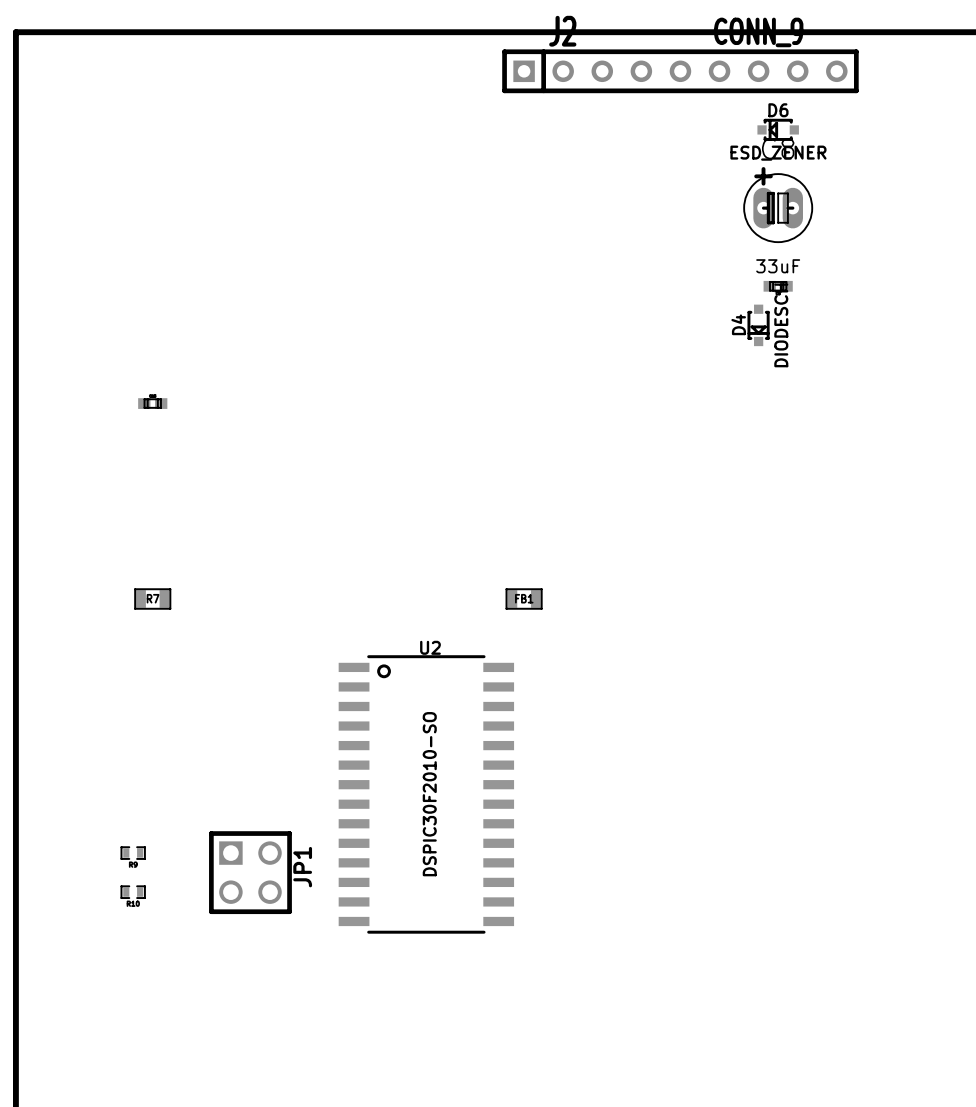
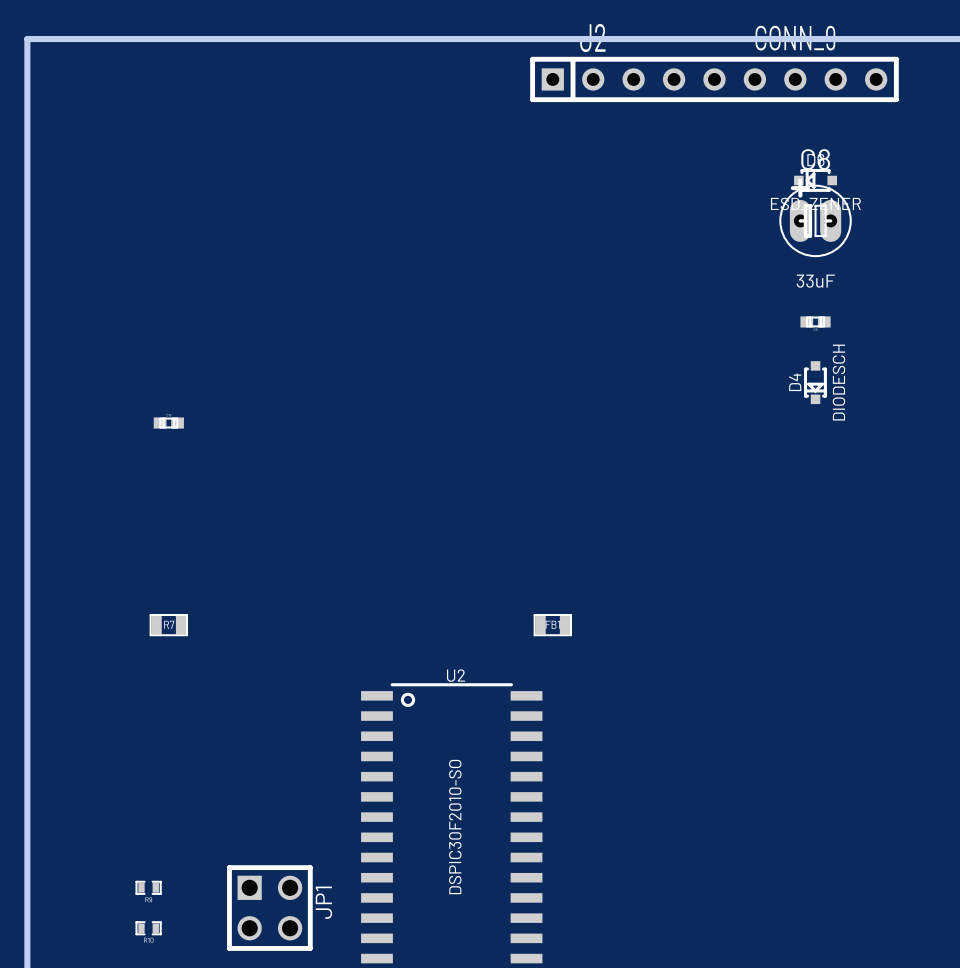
D6 position: (778, 129) -> (815, 180)
part position: (778, 286) -> (815, 321)
D4 position: (758, 325) -> (815, 382)

